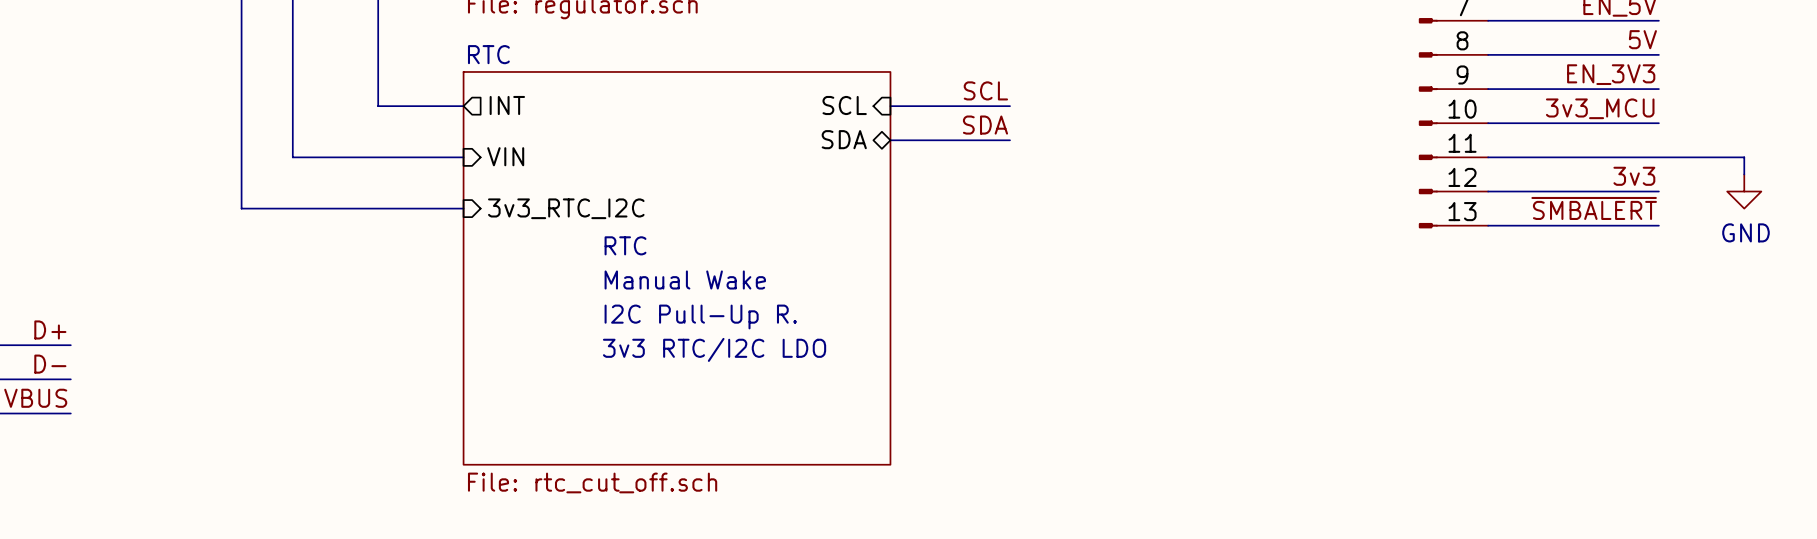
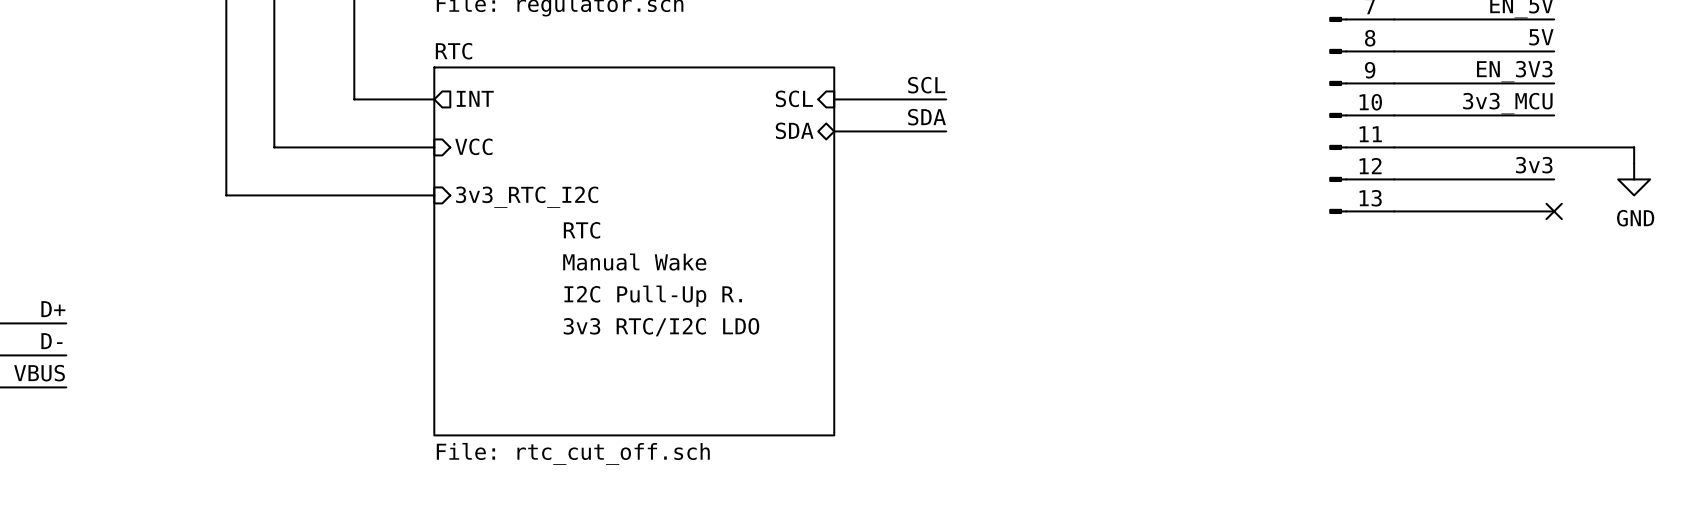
sheet pin: VIN (505, 156) -> VCC (473, 146)
label: ~{SMBALERT} (1594, 208) -> none
no-connect mark: none -> (1554, 211)

